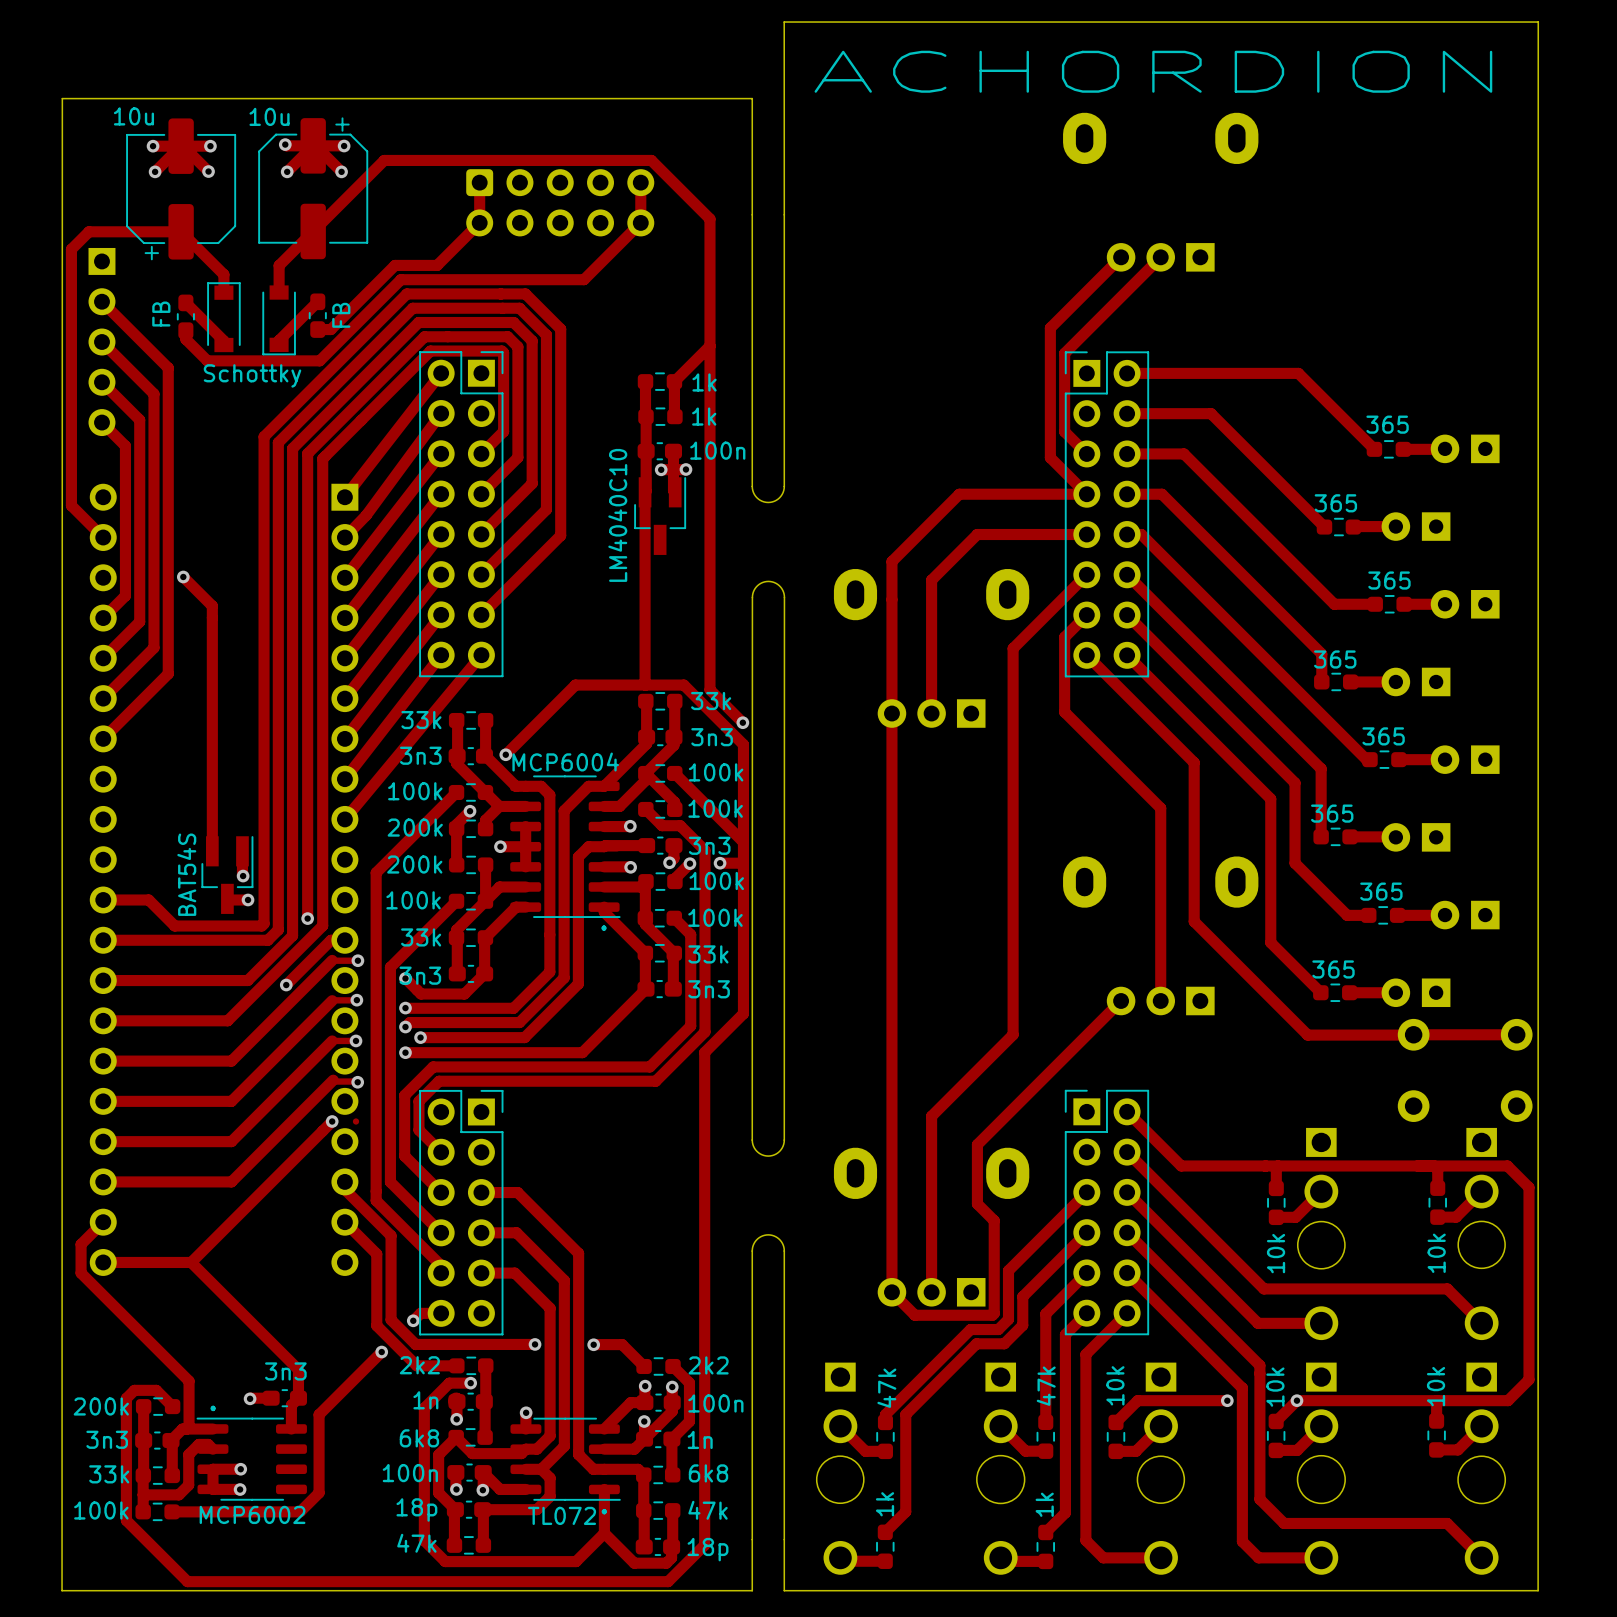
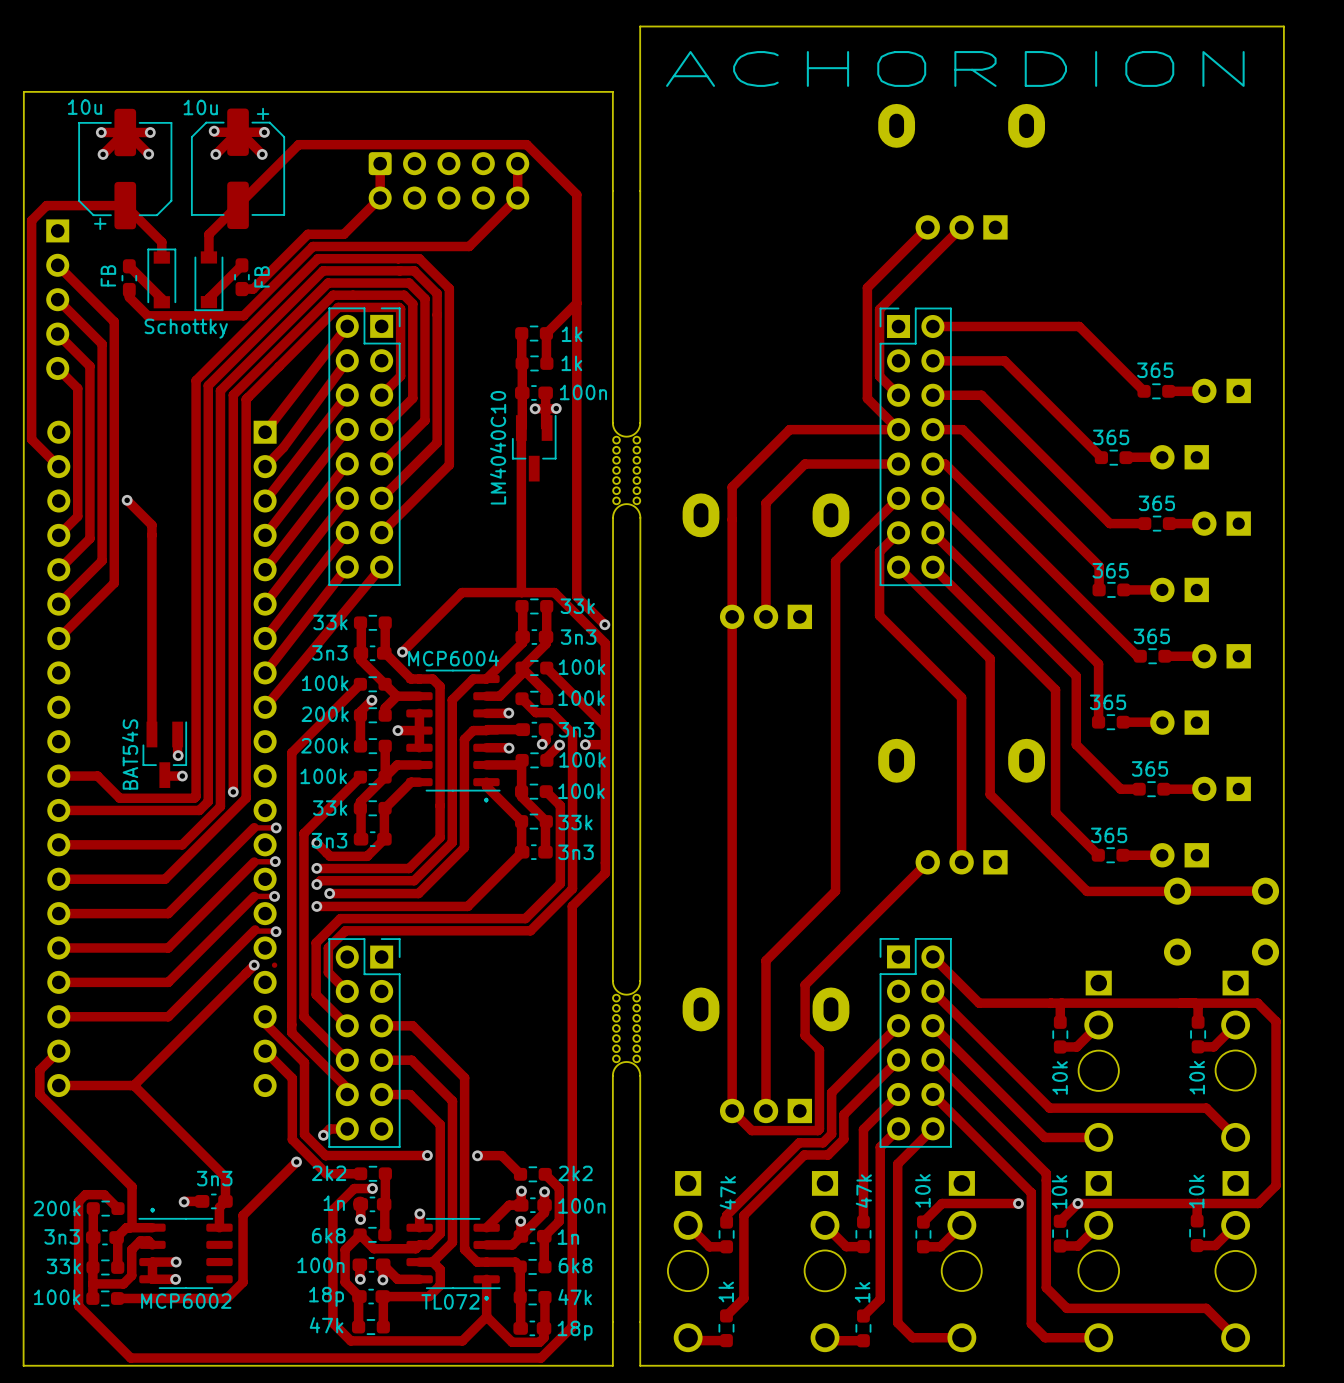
part: none -> (626, 470)
track: (344, 940) (331, 940) (286, 985) -> none
via: (286, 985) -> none
part: none -> (626, 1028)

